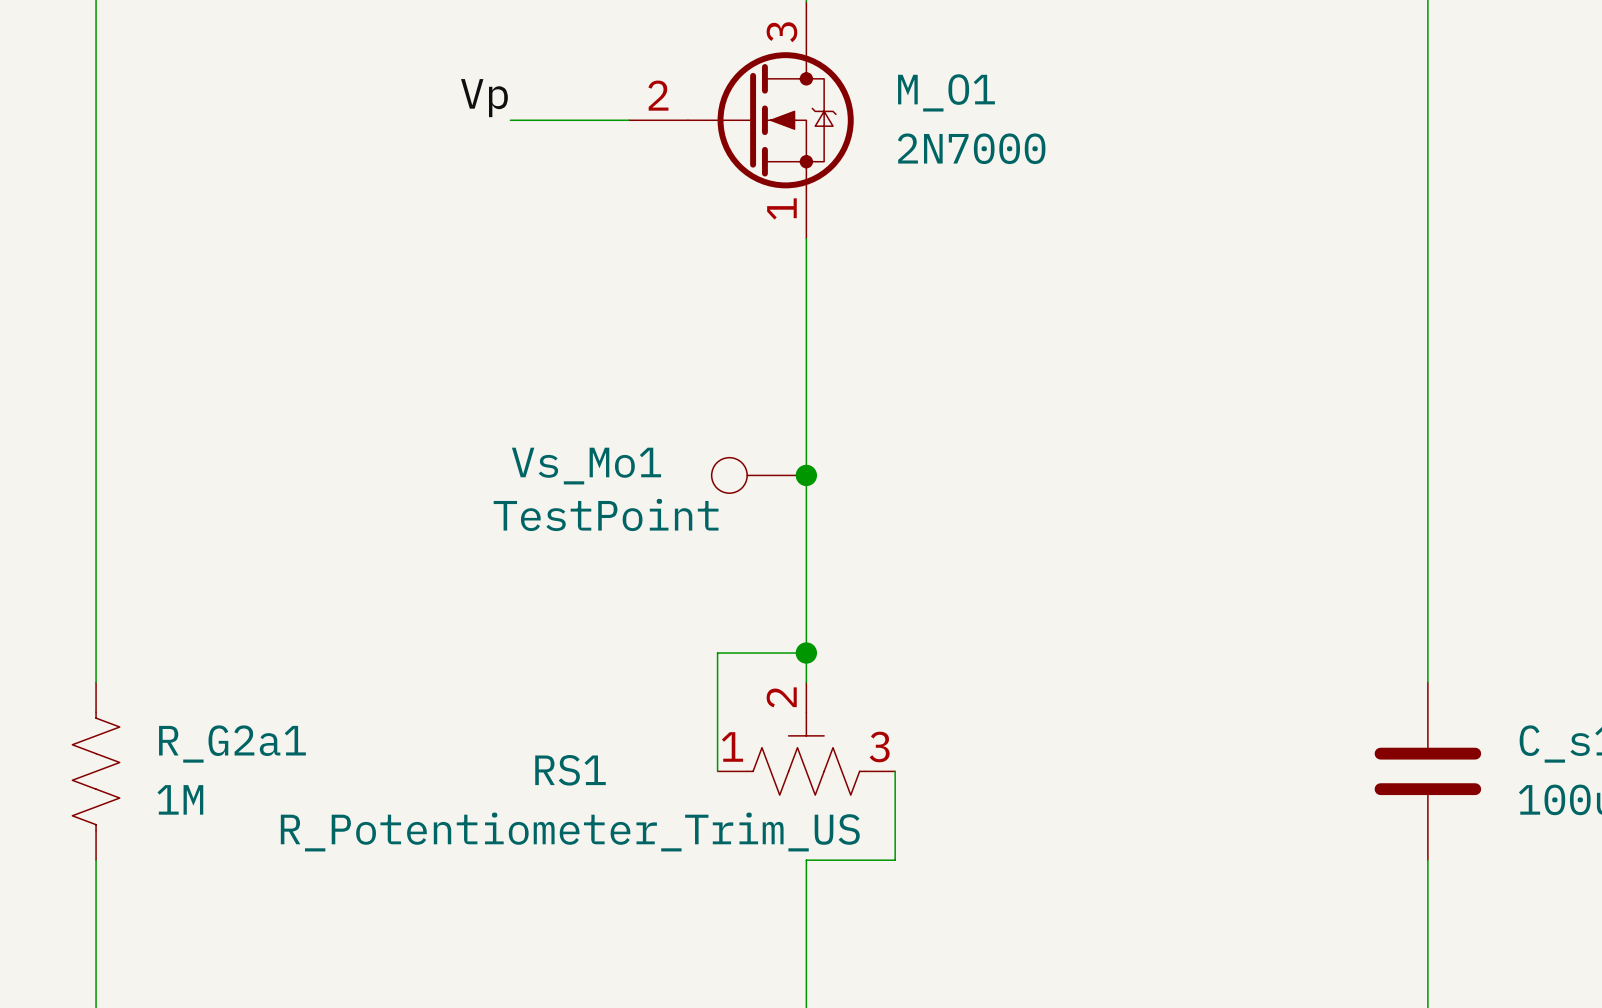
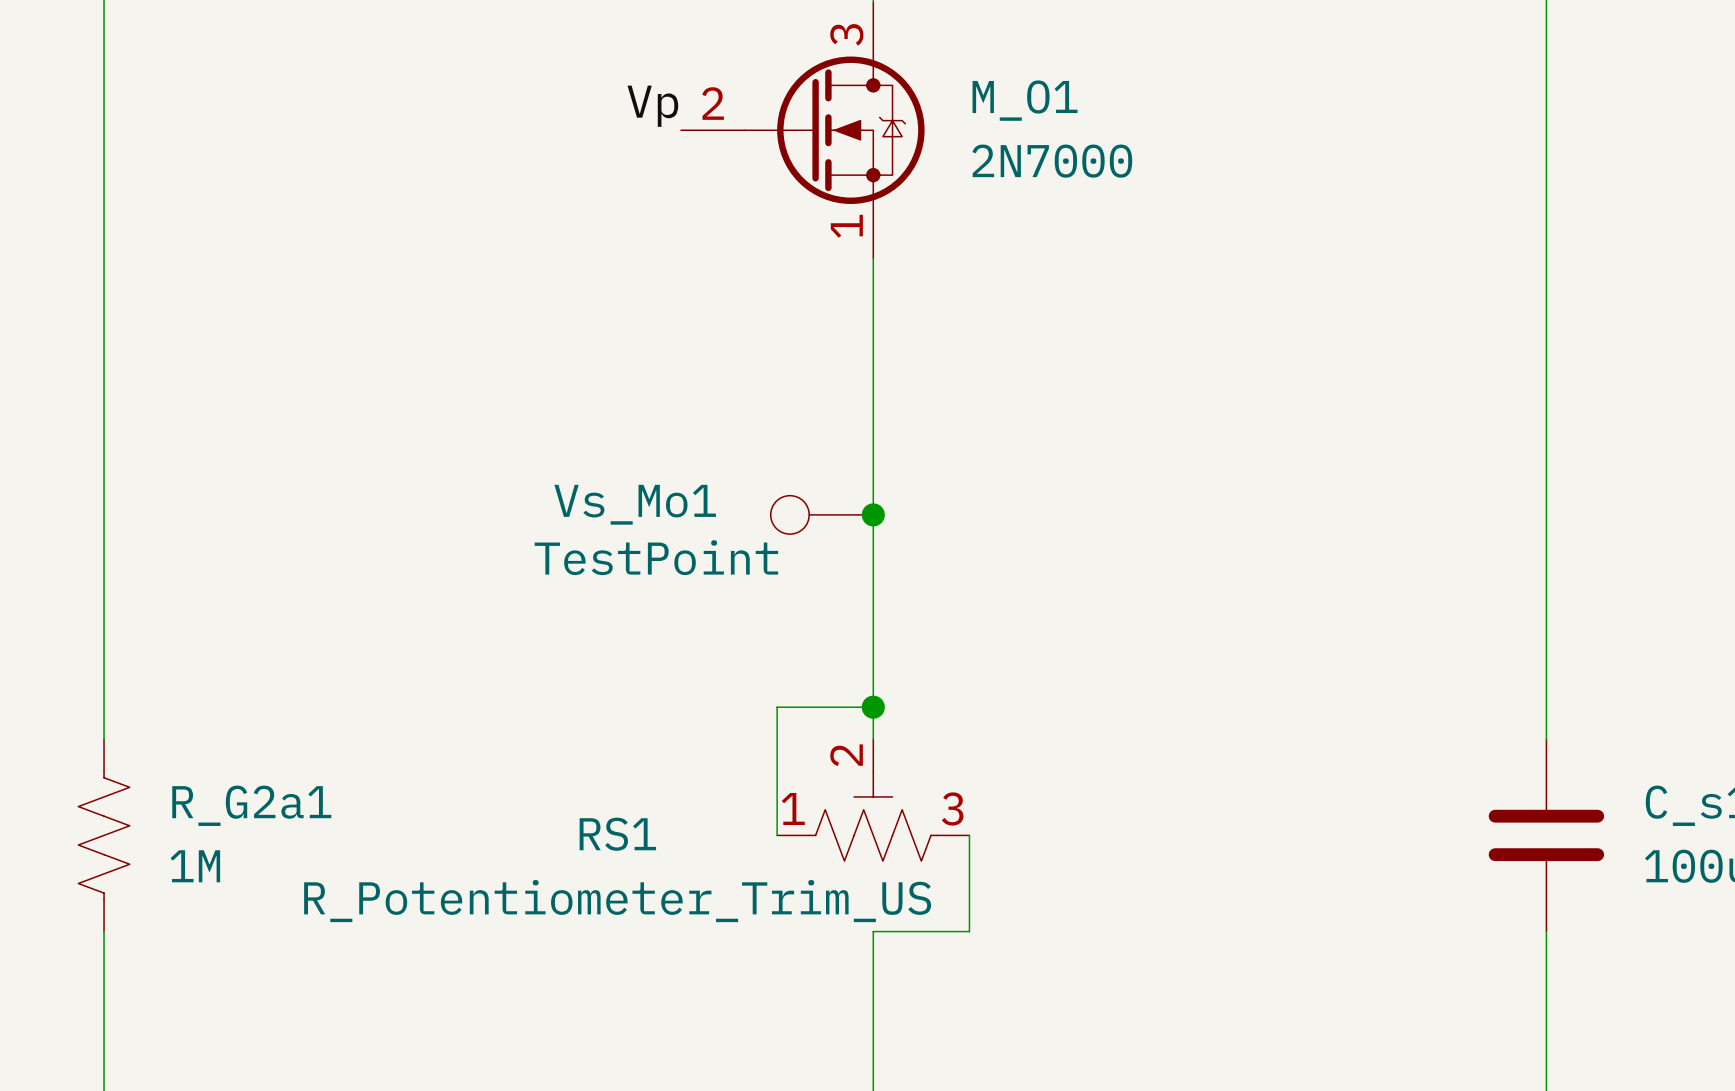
label position: Vp (484, 98) -> Vp (652, 106)
wire: (510, 120) (628, 120) -> none

